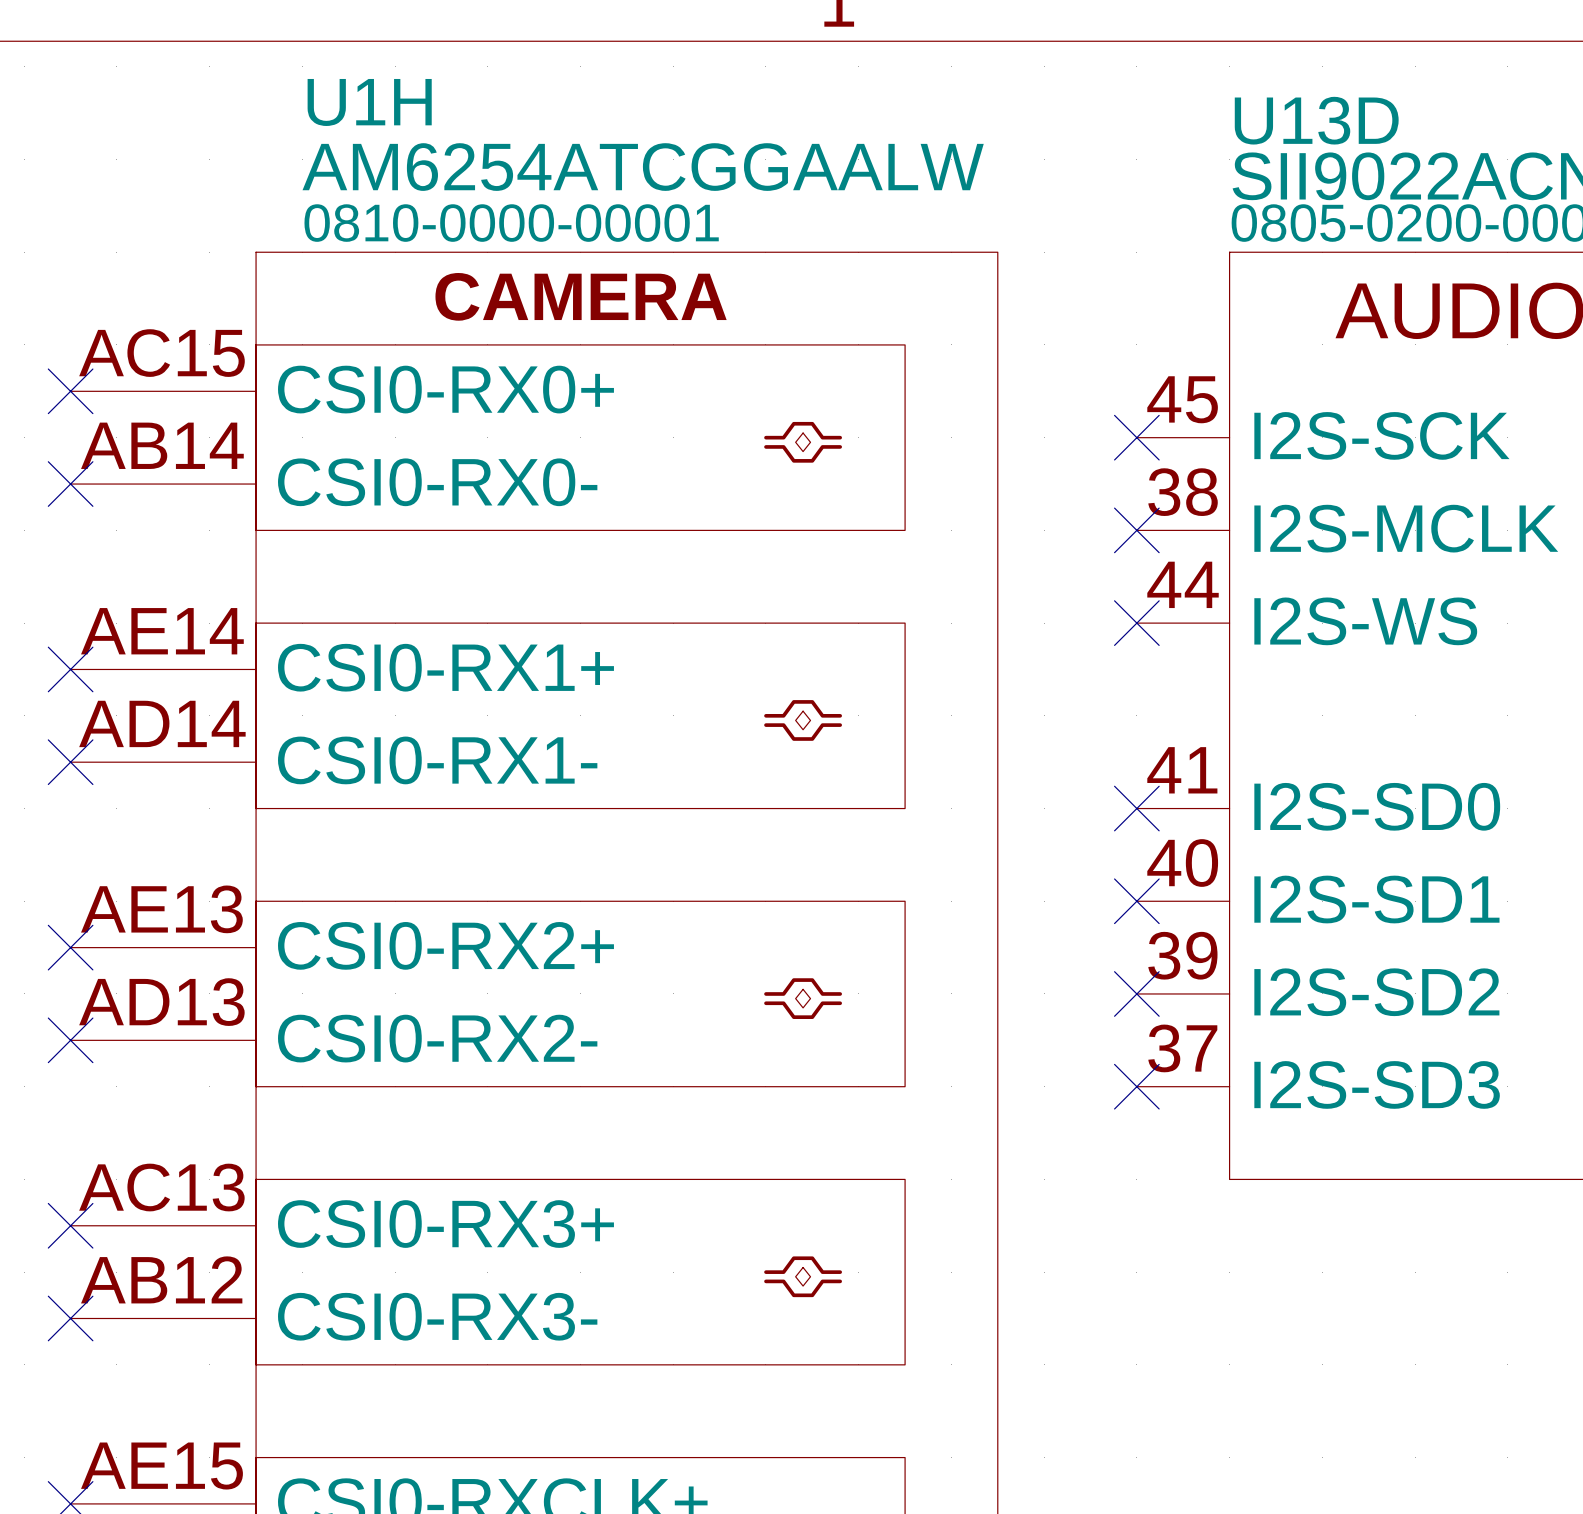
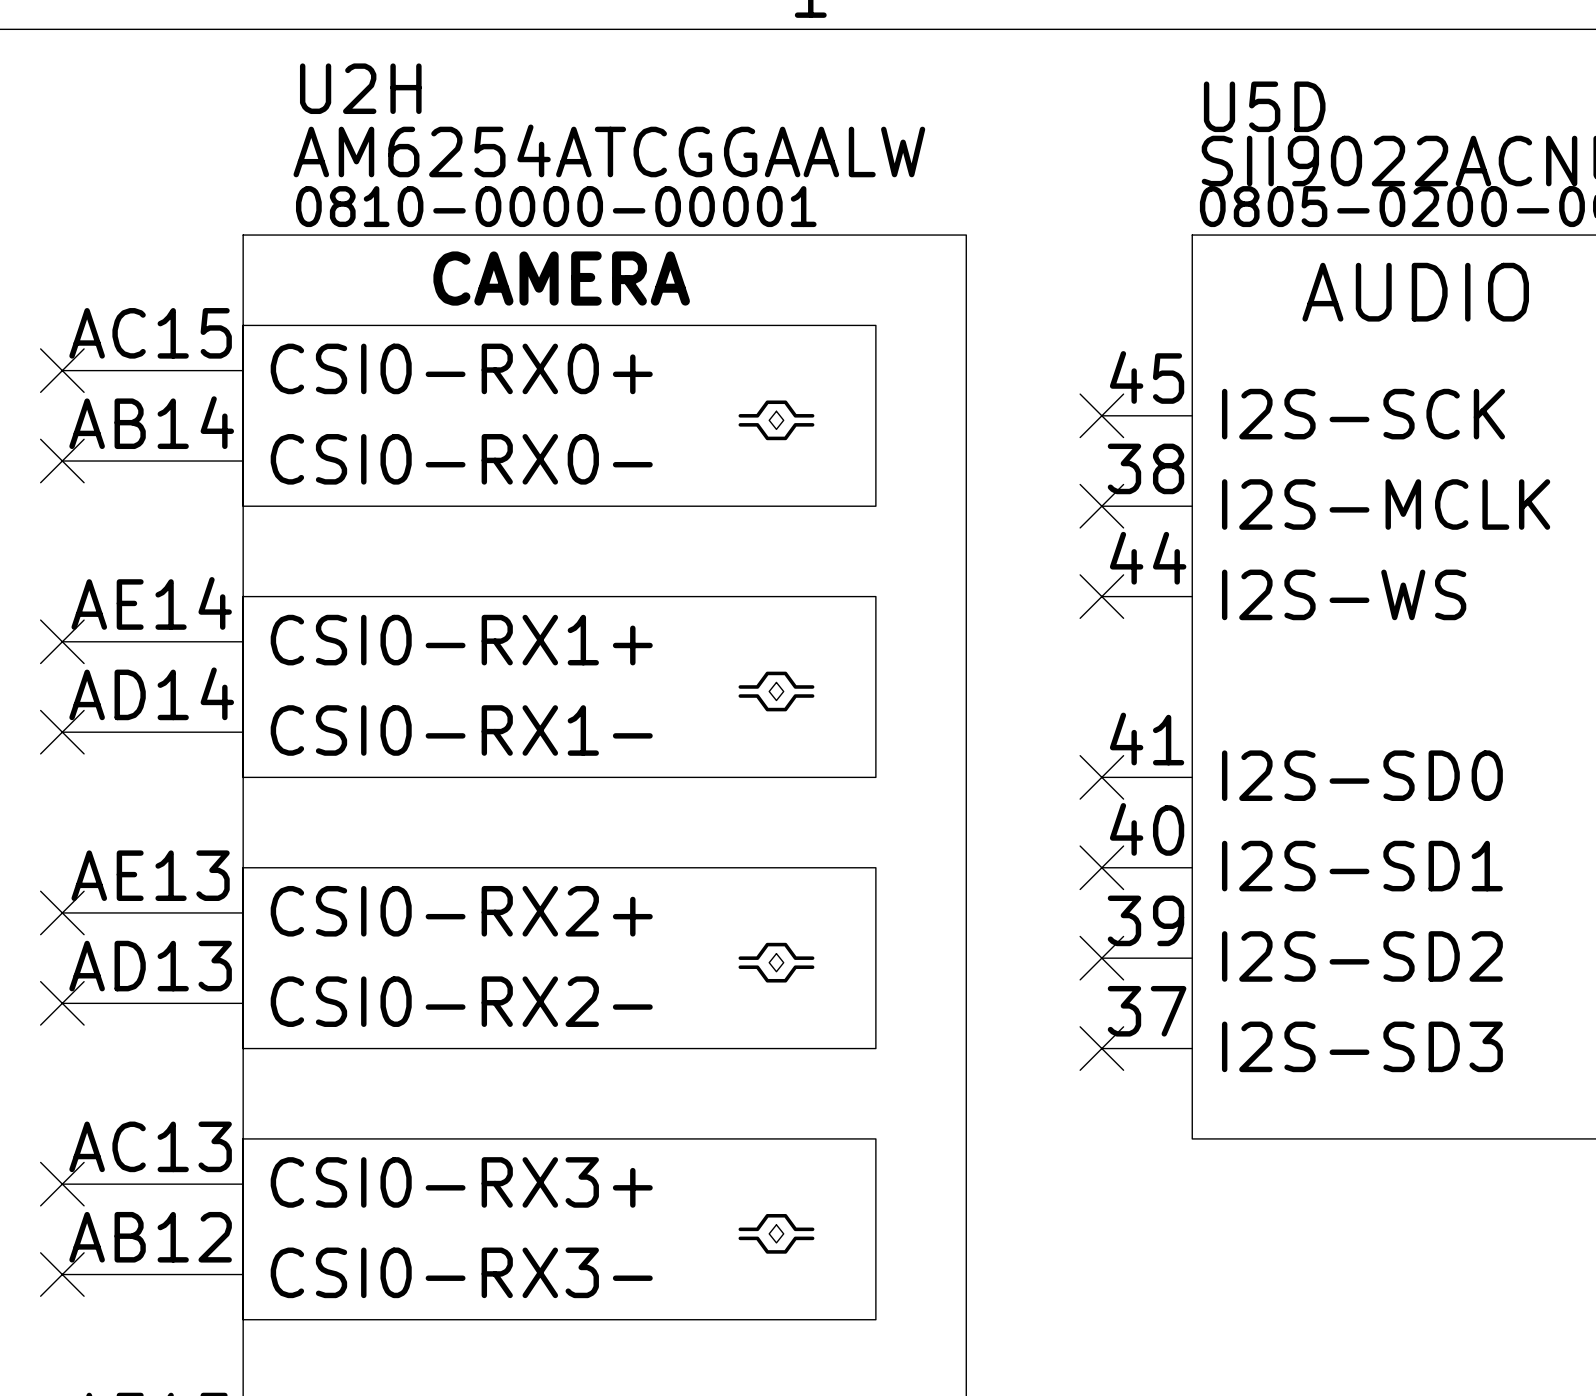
U1H name: U1H (369, 102) -> U2H (360, 88)
U13D name: U13D (1316, 120) -> U5D (1264, 106)

